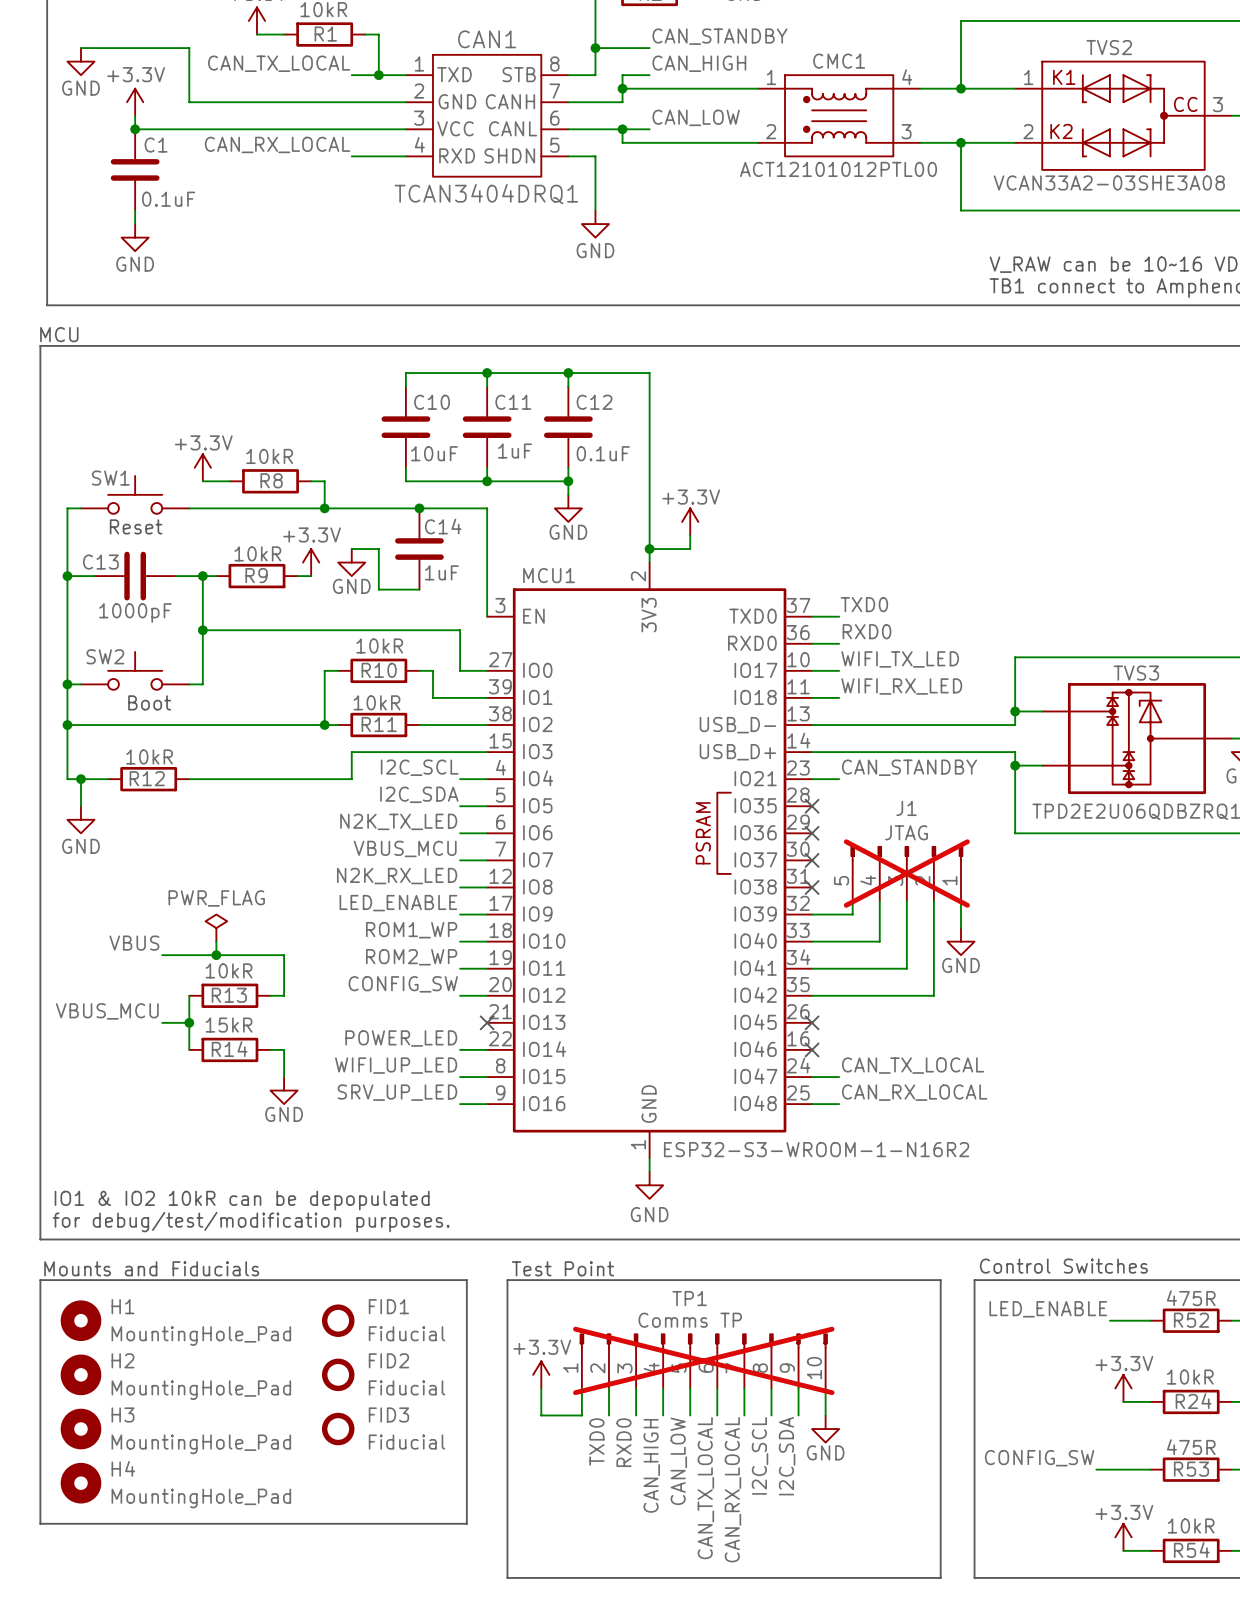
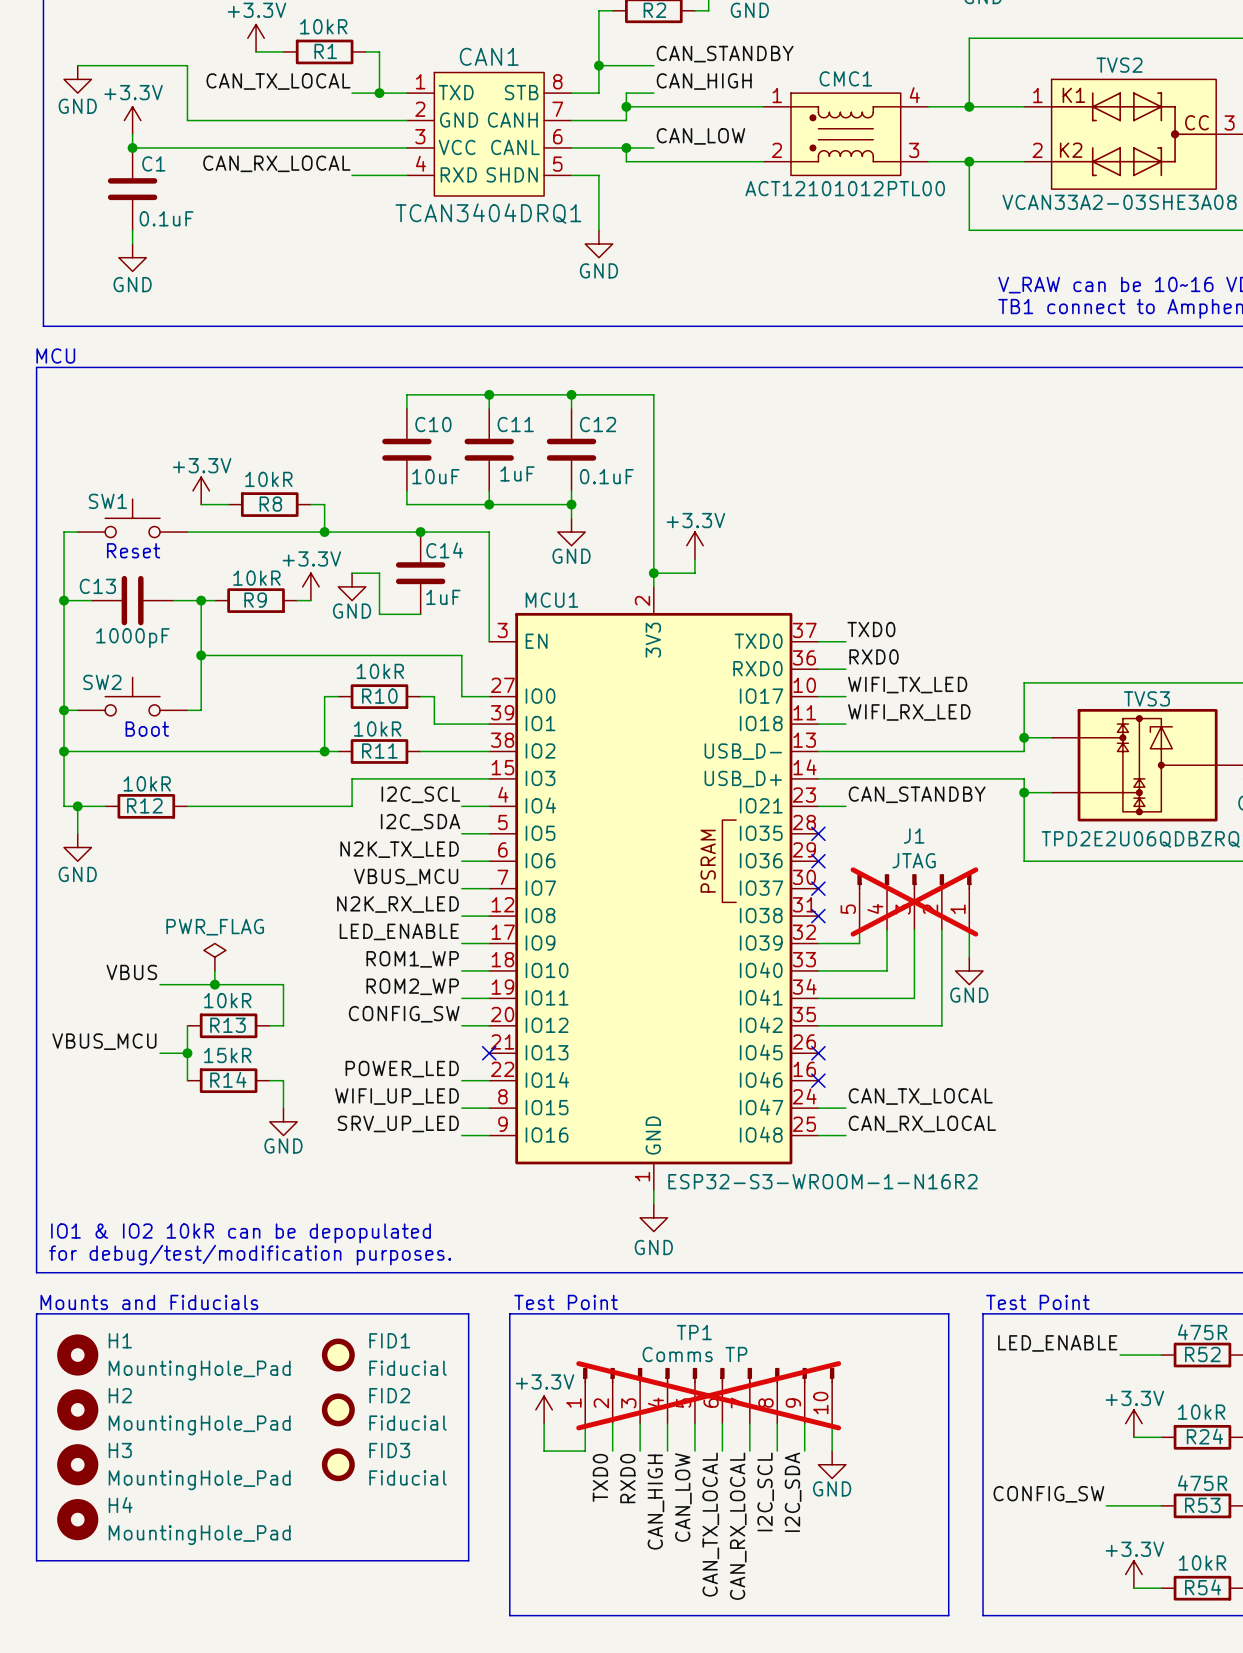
text: Control Switches (1063, 1266) -> none
text: none -> Test Point (1037, 1302)

